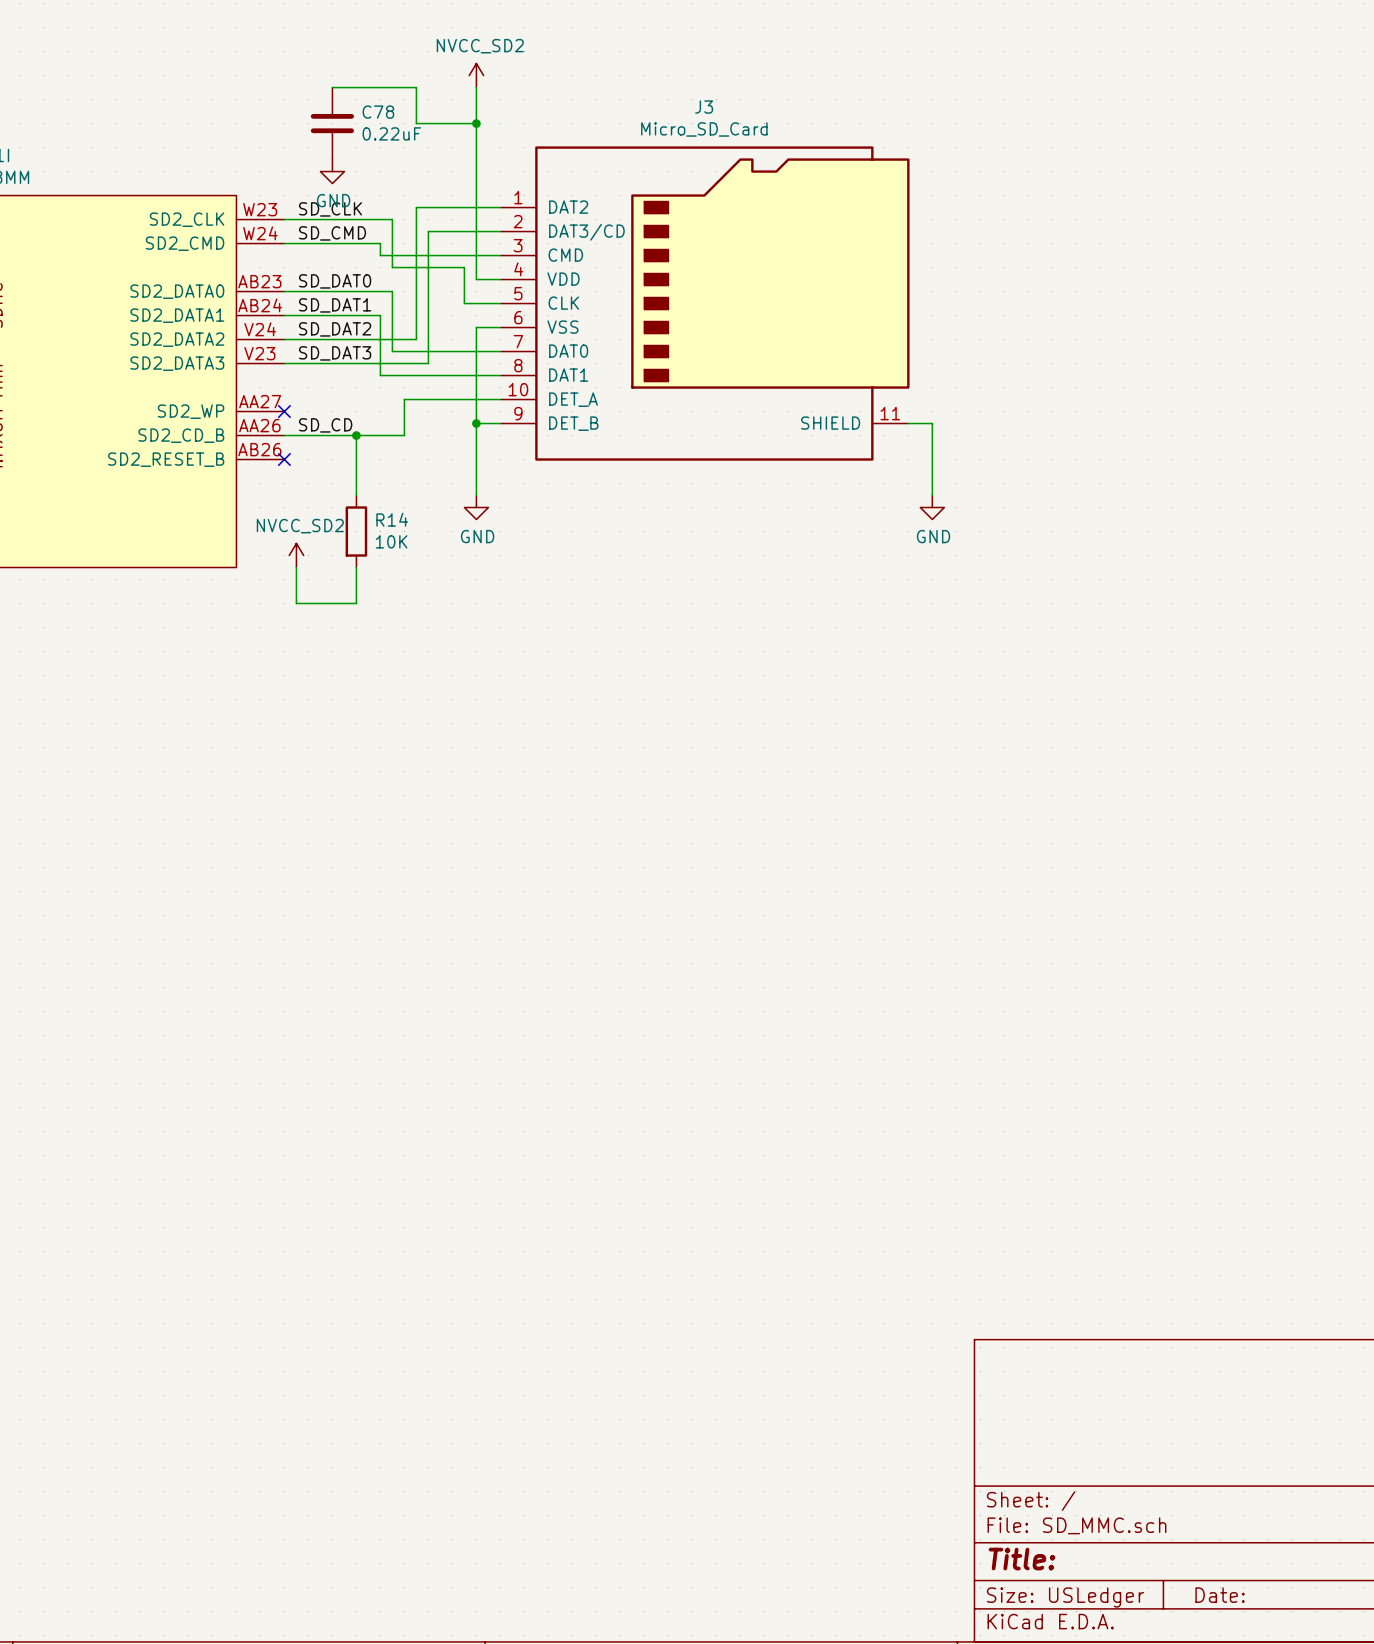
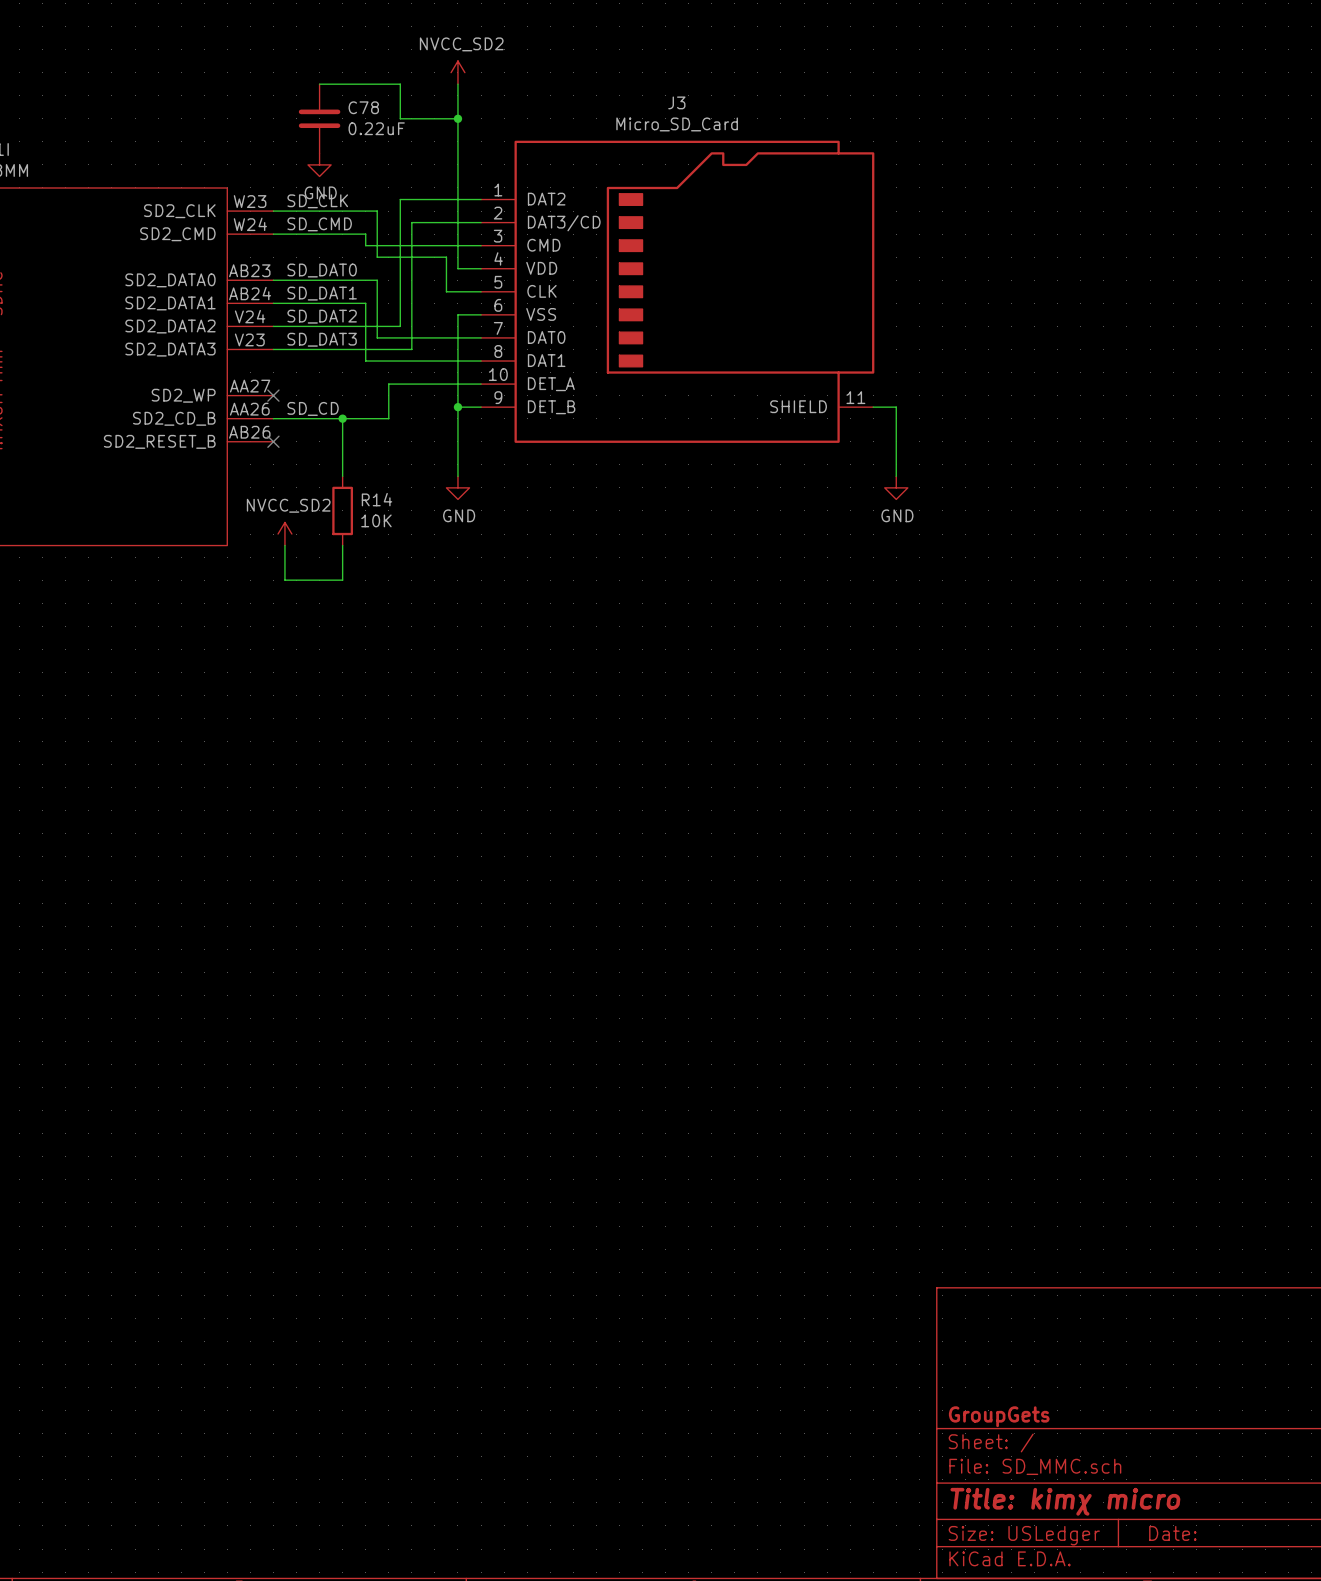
title block: none -> GroupGets (999, 1416)
title block: Title: (1022, 1559) -> Title: kimχ micro (1065, 1501)

